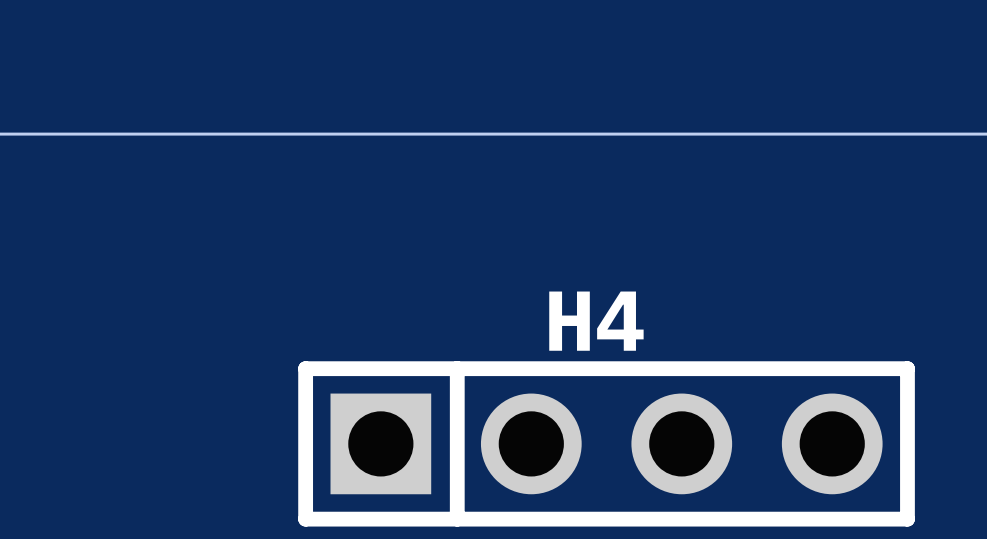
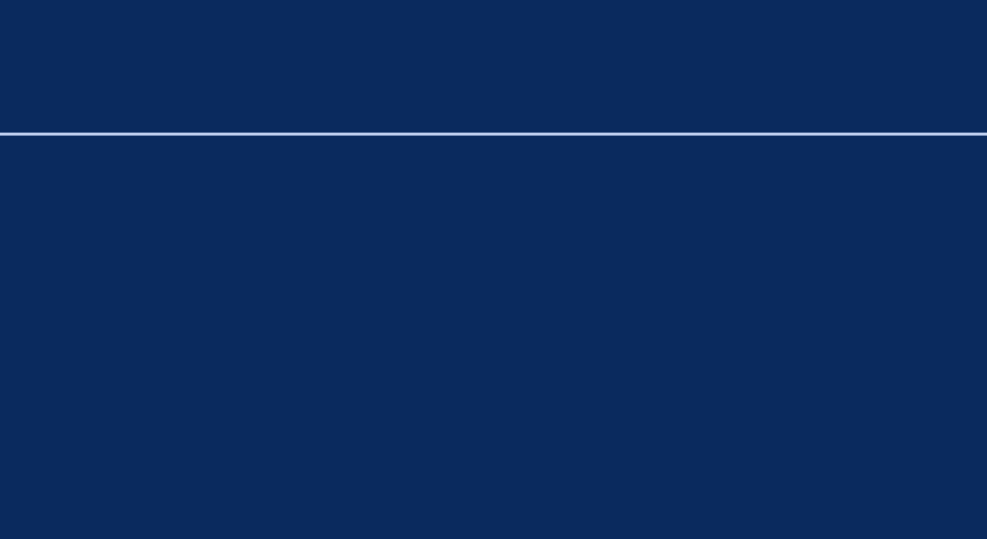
H4: (606, 443) -> none

